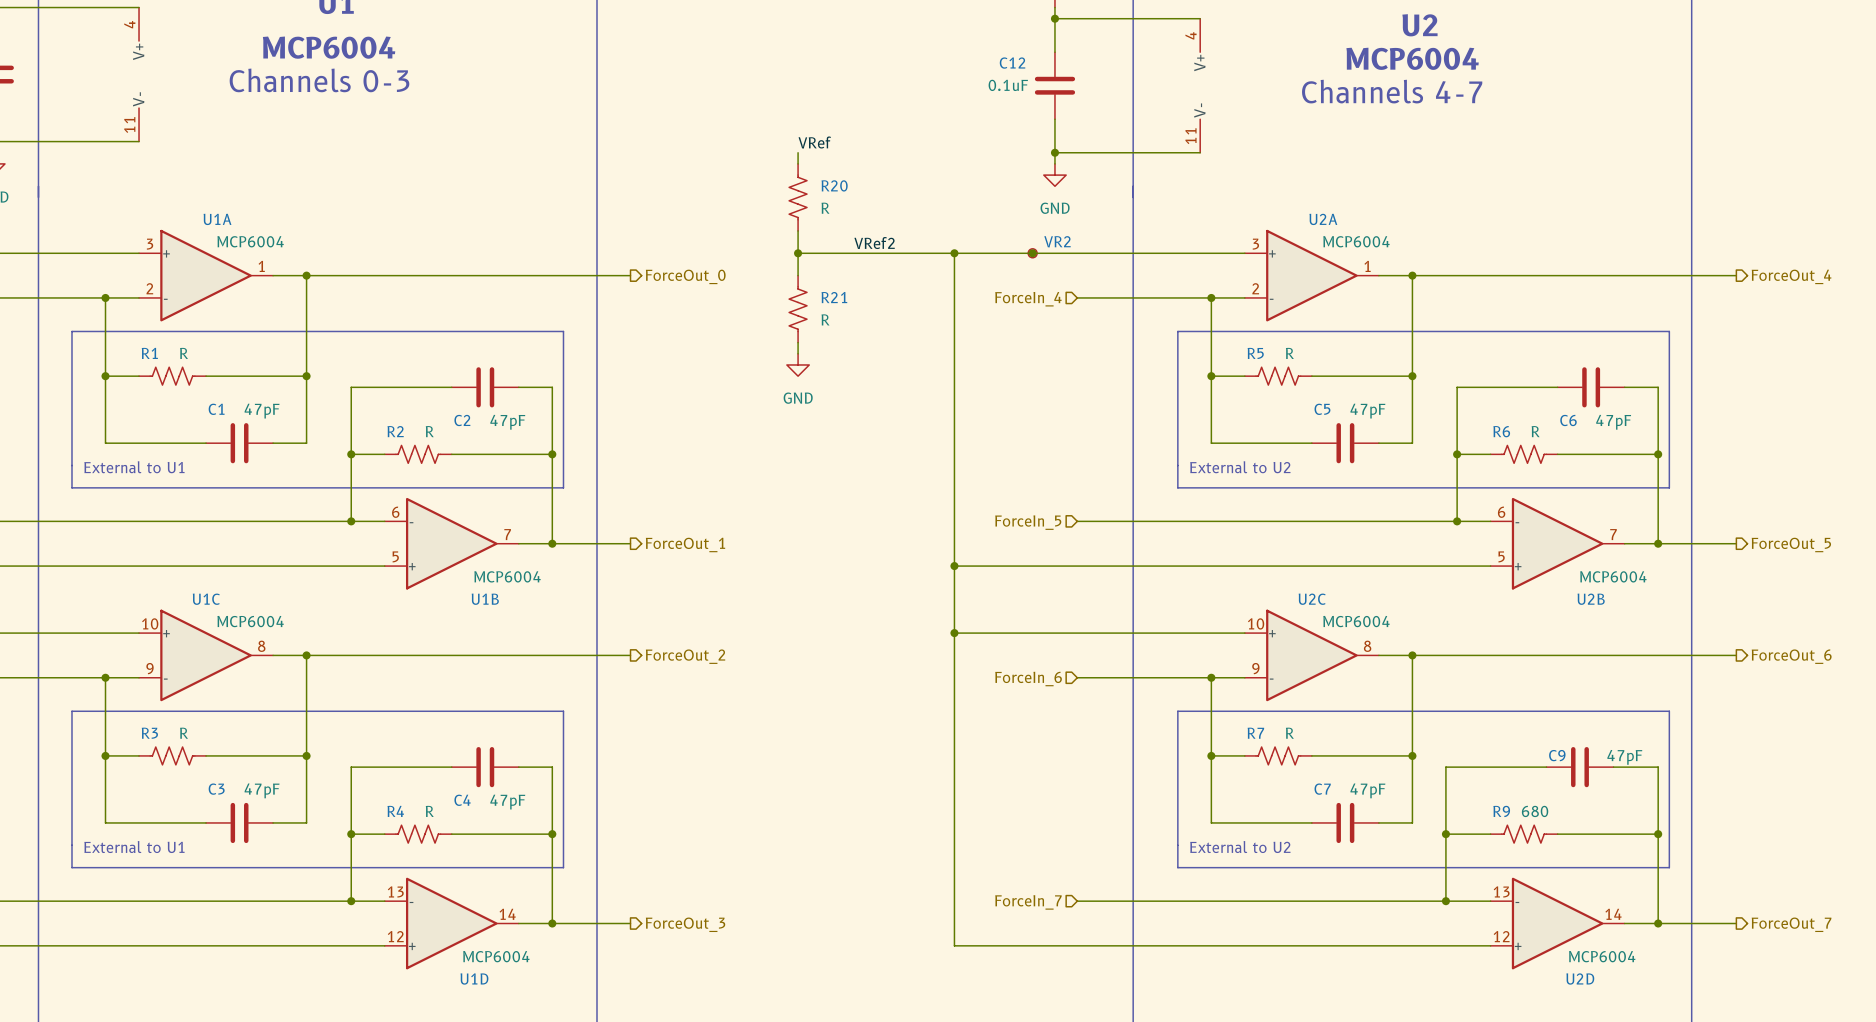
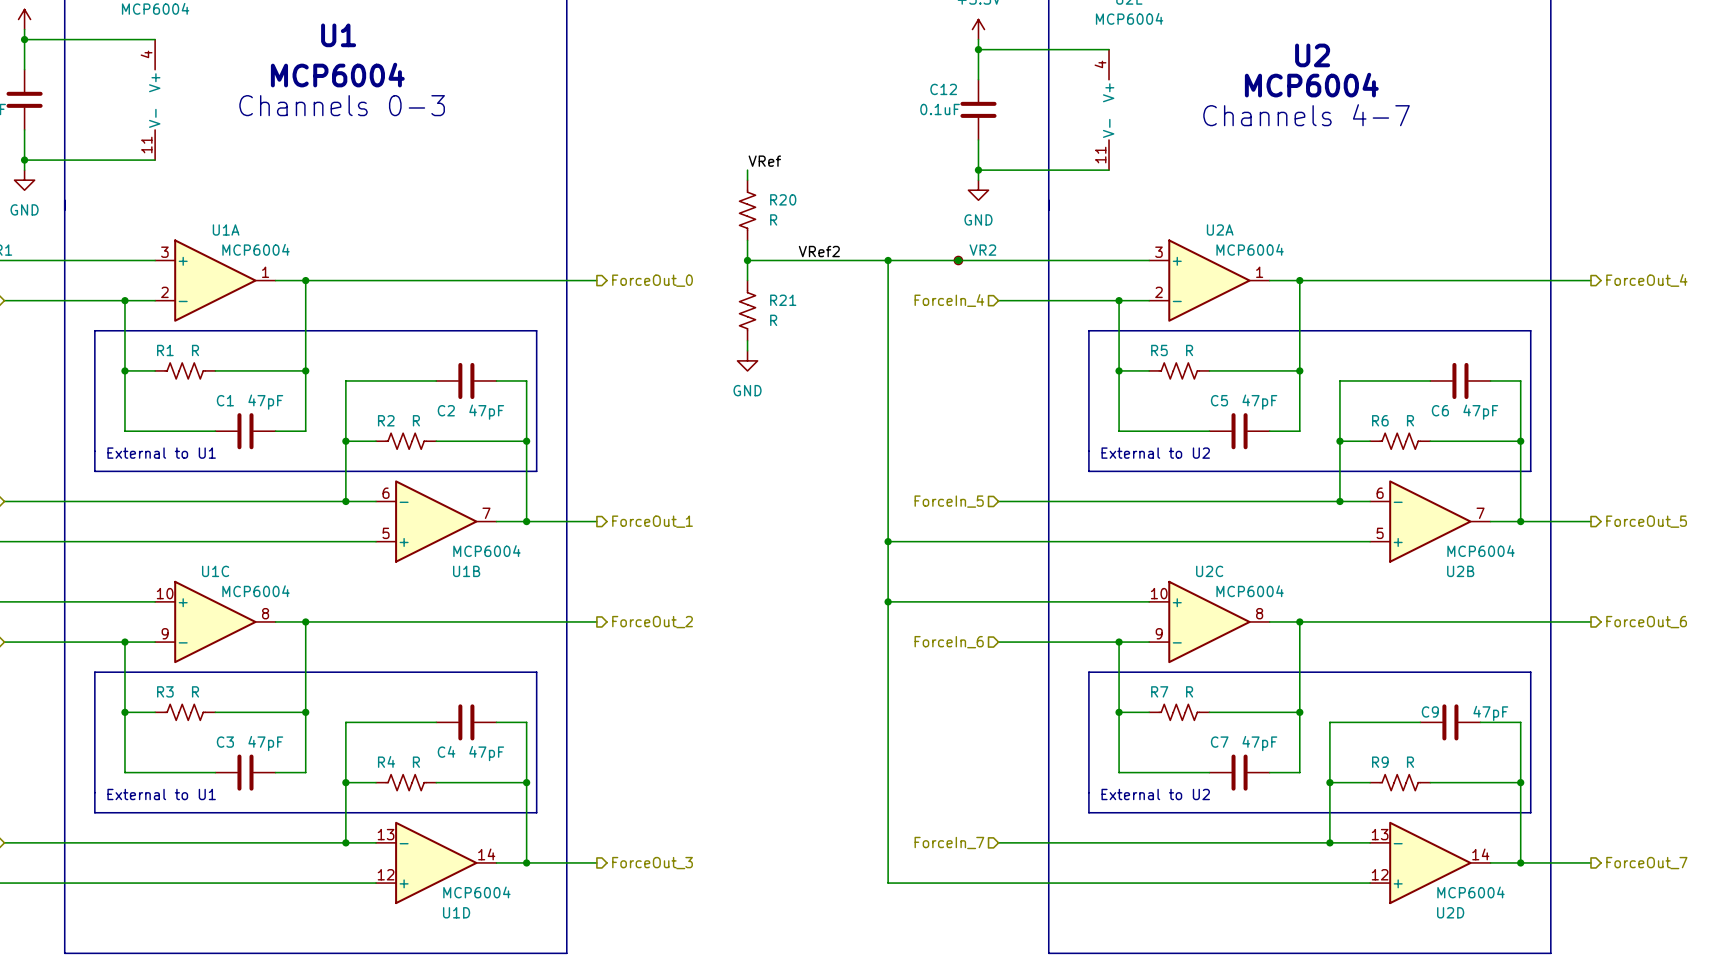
R9 value: 680 (1535, 811) -> R (1410, 762)

